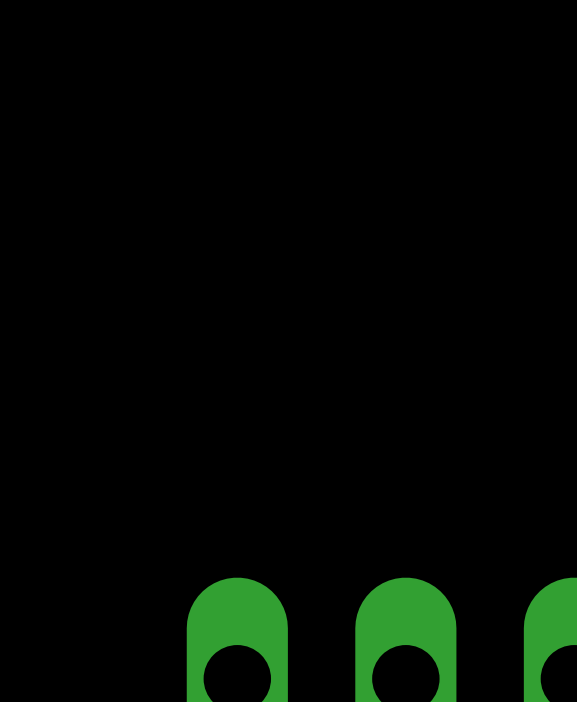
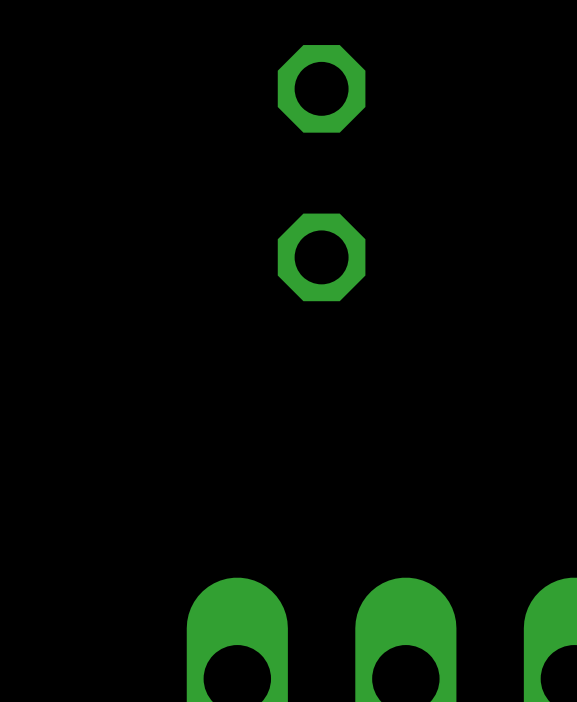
part: none -> (321, 173)

